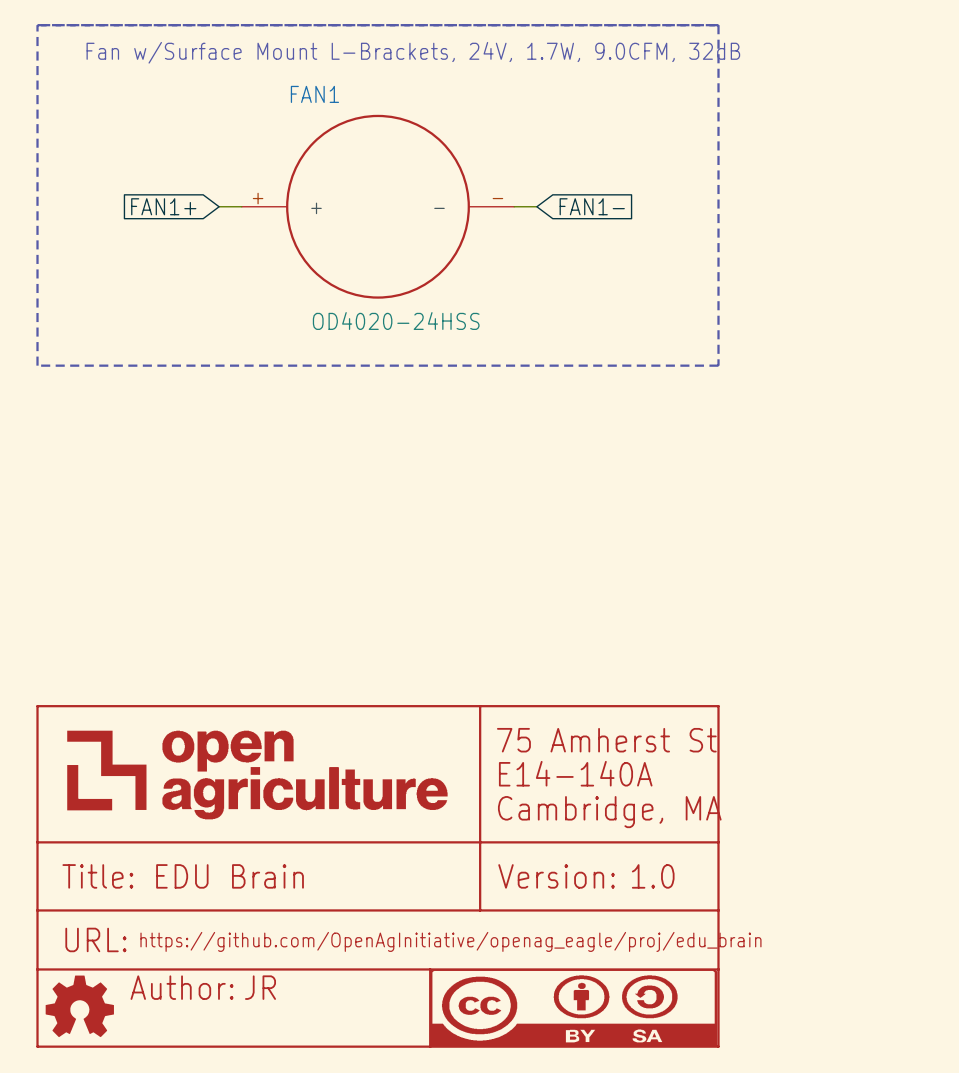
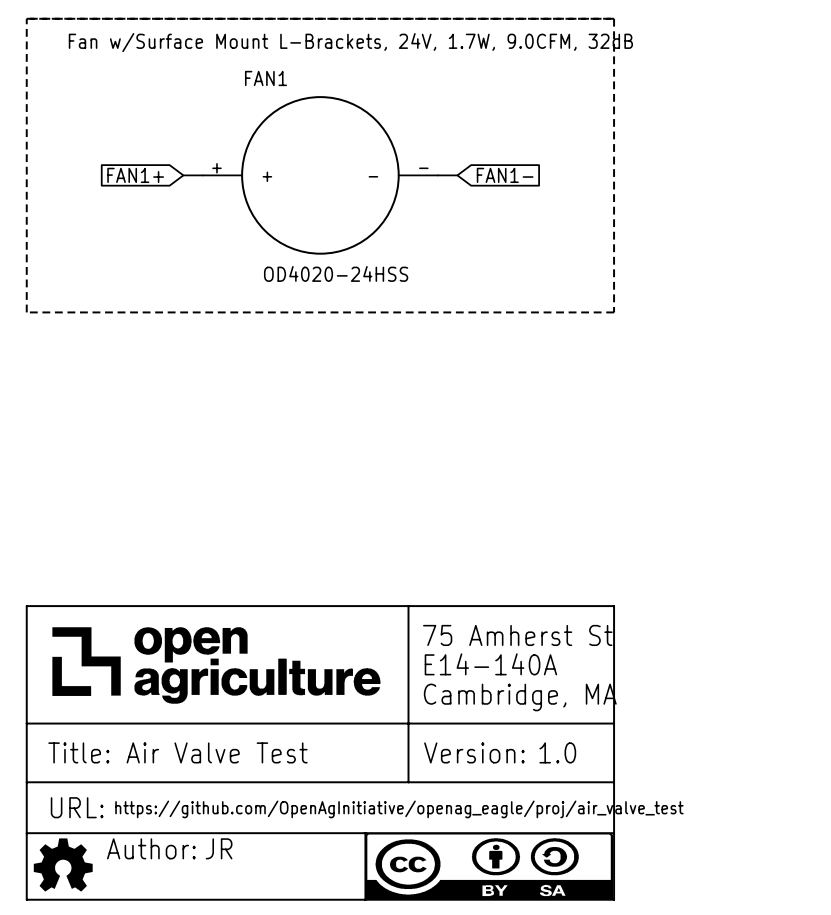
part text: EDU Brain (230, 876) -> Air Valve Test (217, 752)
part text: https://github.com/OpenAgInitiative/openag_eagle/proj/edu_brain (450, 941) -> https://github.com/OpenAgInitiative/openag_eagle/proj/air_valve_test (399, 809)

